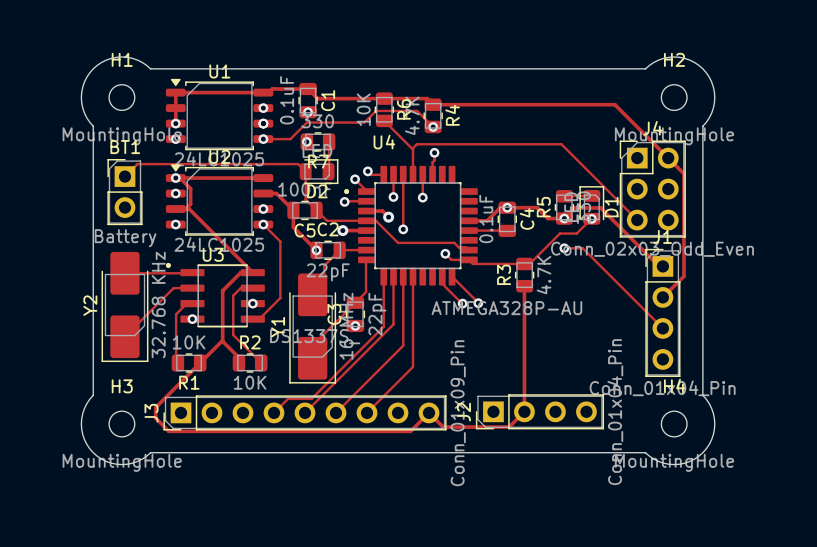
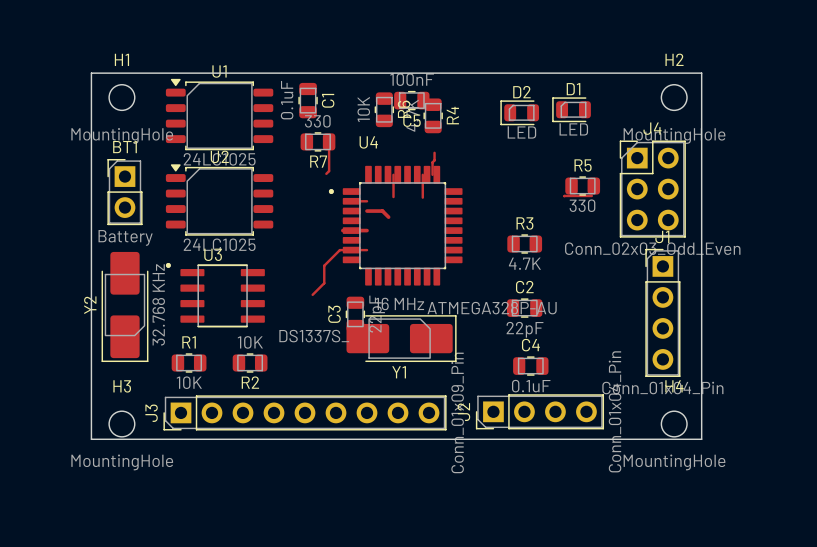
board edge: (150, 68) (645, 68) (658, 60) (674, 56) (689, 60) (698, 65) (709, 77) (714, 97) (711, 113) (702, 126) (702, 395) (711, 408) (714, 424) (711, 439) (706, 448) (694, 459) (674, 464) (658, 461) (645, 452) (150, 452) (137, 461) (121, 464) (106, 461) (97, 456) (86, 444) (81, 424) (84, 408) (93, 395) (93, 126) (82, 108) (81, 92) (89, 72) (97, 65) (111, 58) (132, 58) (150, 68) -> (91, 73) (91, 439) (701, 439) (701, 73) (91, 73)
via: (263, 108) -> none
via: (308, 112) -> none
track: (384, 120) (413, 149) (413, 174) -> none
track: (175, 123) (175, 92) (268, 92) (272, 89) (308, 89) (317, 98) (427, 98) (433, 104) (614, 104) (683, 173) (683, 276) (662, 297) (662, 294) -> none
via: (175, 123) -> none
via: (263, 123) -> none
track: (433, 126) (417, 110) (375, 110) (364, 122) (307, 122) (290, 139) (263, 139) -> none
via: (433, 126) -> none
via: (175, 139) -> none
via: (263, 139) -> none
via: (306, 141) -> none
track: (412, 148) (416, 144) (561, 144) (637, 220) -> none
via: (434, 152) -> none
track: (305, 171) (305, 199) (326, 220) (375, 220) (398, 242) (454, 242) (458, 247) (466, 247) (468, 250) -> none
track: (305, 171) (298, 164) (137, 164) (124, 176) -> none
D2 rotation: 0° (319, 171) -> 180° (519, 112)
D2 position: (319, 171) -> (519, 112)
track: (367, 171) (371, 174) (383, 174) -> none
via: (367, 171) -> none
track: (403, 174) (403, 229) -> none
track: (175, 178) (263, 178) -> none
via: (175, 178) -> none
track: (179, 178) (190, 188) (190, 204) (185, 209) -> none
track: (355, 179) (367, 191) -> none
via: (355, 179) -> none
via: (175, 193) -> none
track: (263, 193) (276, 193) (293, 210) (293, 227) (316, 250) -> none
via: (393, 197) -> none
via: (422, 197) -> none
via: (344, 201) -> none
D1 rotation: 0° (591, 205) -> 90° counterclockwise (571, 109)
D1 position: (591, 205) -> (571, 109)
via: (507, 207) -> none
R5 rotation: 0° (564, 207) -> 90° clockwise (582, 186)
R5 position: (564, 207) -> (582, 186)
track: (175, 209) (189, 209) (252, 272) (240, 272) (222, 290) (222, 341) -> none
via: (263, 209) -> none
C5 position: (305, 210) -> (411, 100)
via: (388, 217) -> none
via: (564, 218) -> none
track: (591, 218) (576, 233) (559, 233) (529, 263) (472, 263) (468, 259) (451, 259) (445, 253) -> none
via: (591, 218) -> none
C4 value position: 0.1uF (486, 219) -> 0.1uF (531, 386)
C4 rotation: 0° (507, 219) -> 90° clockwise (530, 366)
C4 position: (507, 219) -> (530, 366)
C4 name position: C4 (527, 219) -> C4 (530, 345)
track: (468, 220) (487, 220) (500, 207) (537, 207) (548, 218) (564, 218) (574, 208) (600, 208) (659, 266) (662, 266) -> none
via: (175, 224) -> none
track: (263, 224) (280, 241) (280, 298) (259, 319) (252, 319) -> none
via: (263, 224) -> none
U4 position: (410, 225) -> (395, 225)
via: (403, 229) -> none
via: (342, 230) -> none
track: (468, 230) (507, 230) -> none
track: (564, 248) (582, 248) (662, 328) -> none
via: (564, 248) -> none
via: (316, 250) -> none
C2 position: (328, 250) -> (524, 308)
via: (445, 253) -> none
track: (367, 259) (366, 292) (312, 345) (312, 358) -> none
track: (192, 272) (124, 273) -> none
R3 rotation: 0° (524, 275) -> 90° clockwise (524, 244)
R3 position: (524, 275) -> (524, 244)
track: (383, 276) (383, 326) (311, 398) (288, 398) (274, 412) -> none
track: (393, 276) (393, 324) (305, 412) -> none
track: (403, 276) (403, 345) (336, 412) -> none
track: (413, 276) (413, 366) (367, 412) -> none
track: (442, 276) (442, 283) (462, 303) -> none
track: (452, 276) (478, 303) -> none
track: (525, 285) (524, 411) (509, 427) (443, 427) (429, 412) (410, 431) (168, 431) (155, 418) (155, 407) (222, 341) -> none
track: (192, 288) (173, 288) (124, 336) -> none
track: (252, 288) (240, 288) (233, 295) (233, 335) (261, 363) -> none
track: (192, 303) (186, 303) (176, 314) (176, 361) (177, 363) -> none
via: (252, 303) -> none
via: (462, 303) -> none
via: (478, 303) -> none
via: (192, 319) -> none
via: (355, 325) -> none
Y1 rotation: 0° (312, 328) -> 90° counterclockwise (401, 338)
Y1 position: (312, 328) -> (401, 338)
track: (222, 341) (238, 357) (238, 363) -> none
R1 value position: 10K (189, 342) -> 10K (189, 382)
R2 name position: R2 (250, 342) -> R2 (250, 382)
R1 name position: R1 (189, 382) -> R1 (189, 342)
R2 value position: 10K (250, 382) -> 10K (250, 342)

